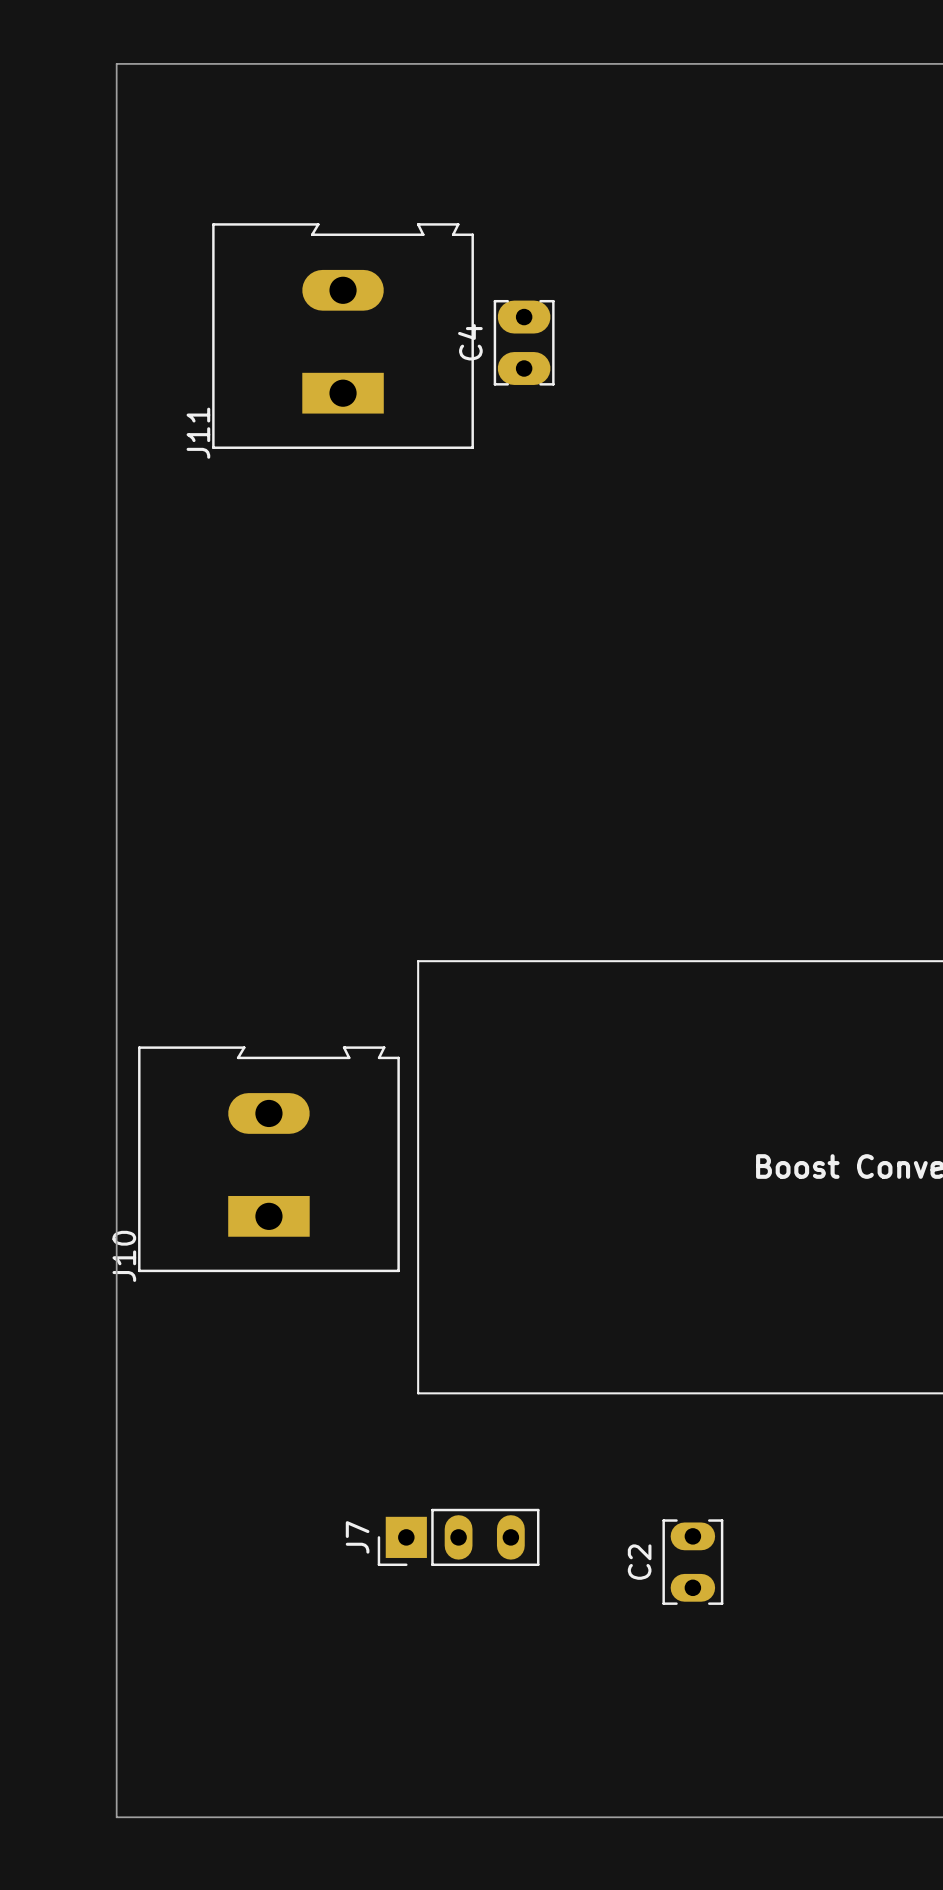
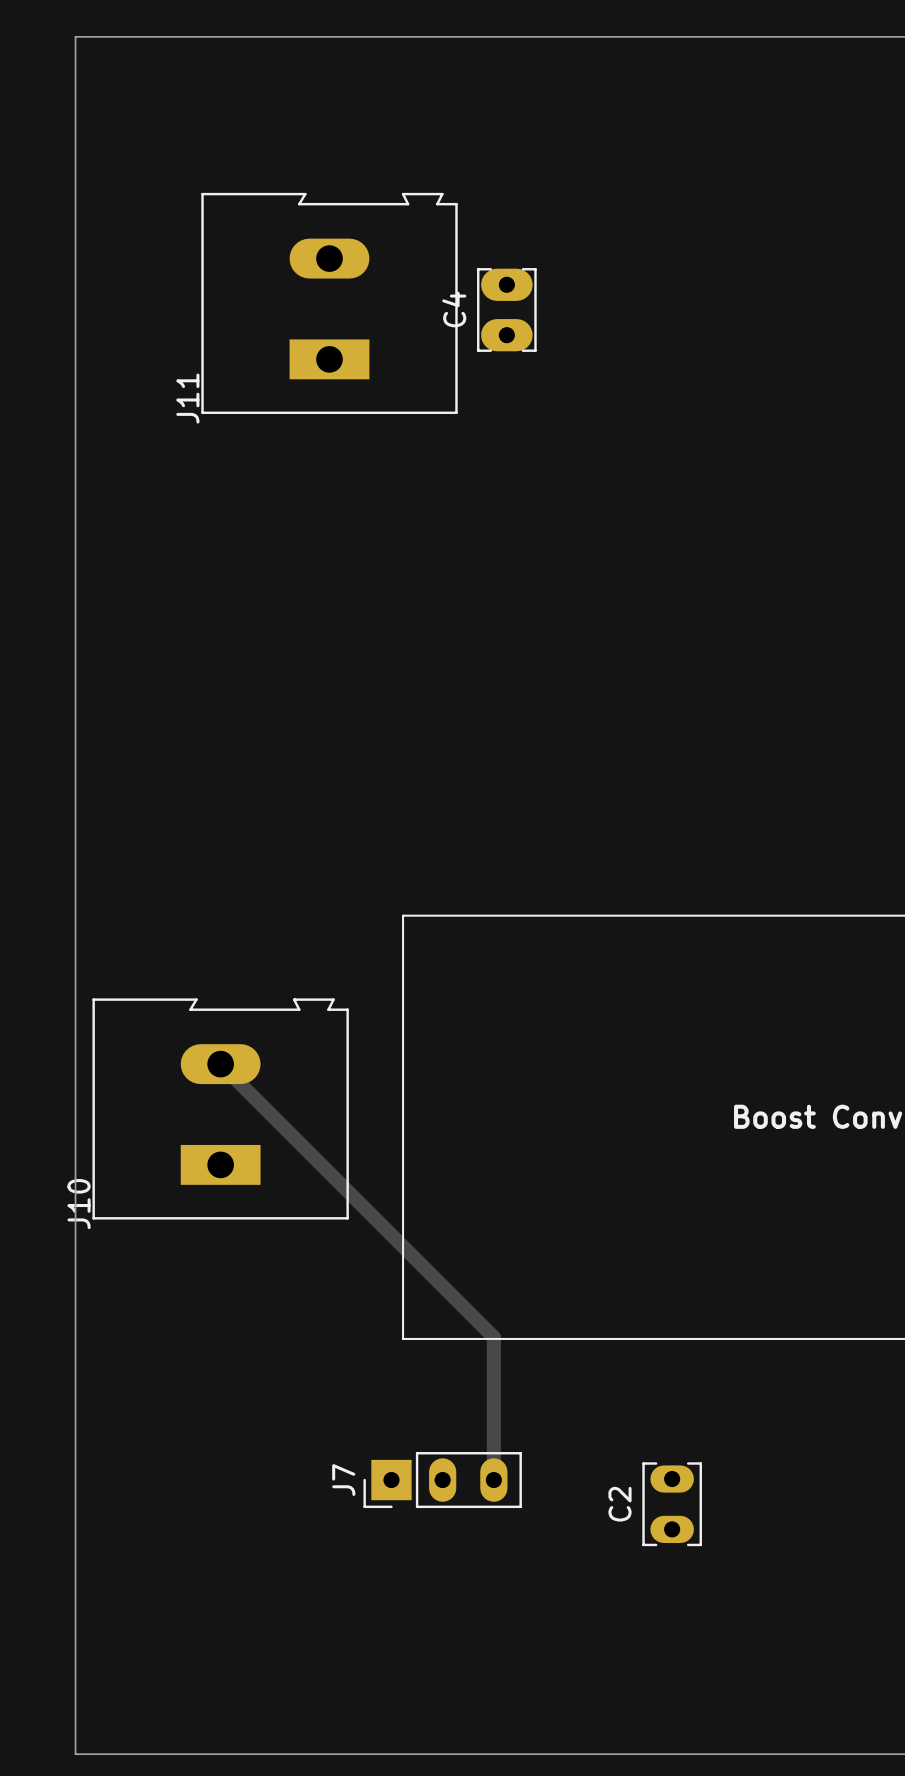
board edge: (116, 63) (116, 1817) -> (107, 36) (75, 36) (75, 1754) (107, 1754)
track: none -> (220, 1064) (493, 1337) (493, 1480)
J10 position: (268, 1159) -> (220, 1108)

